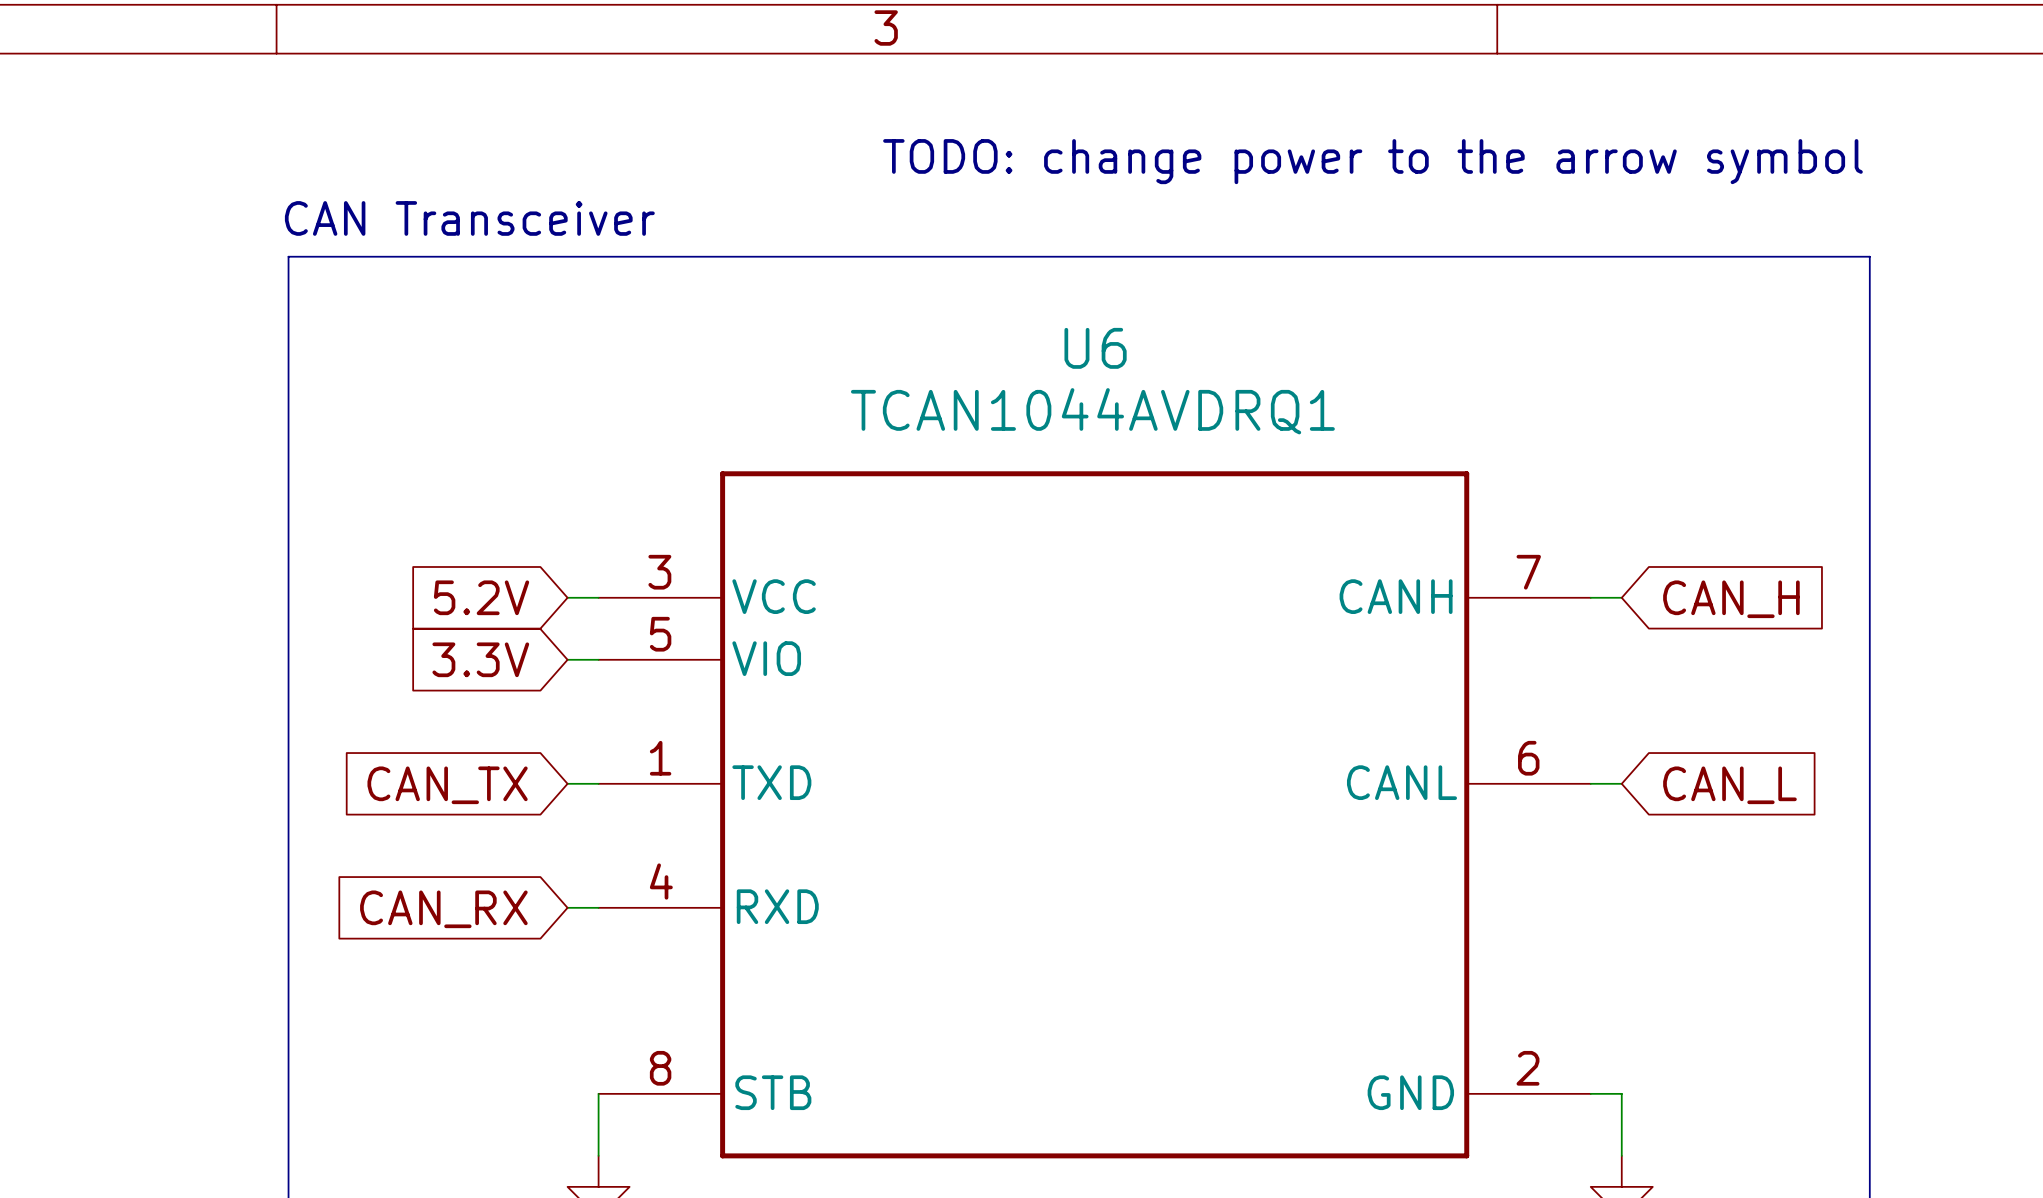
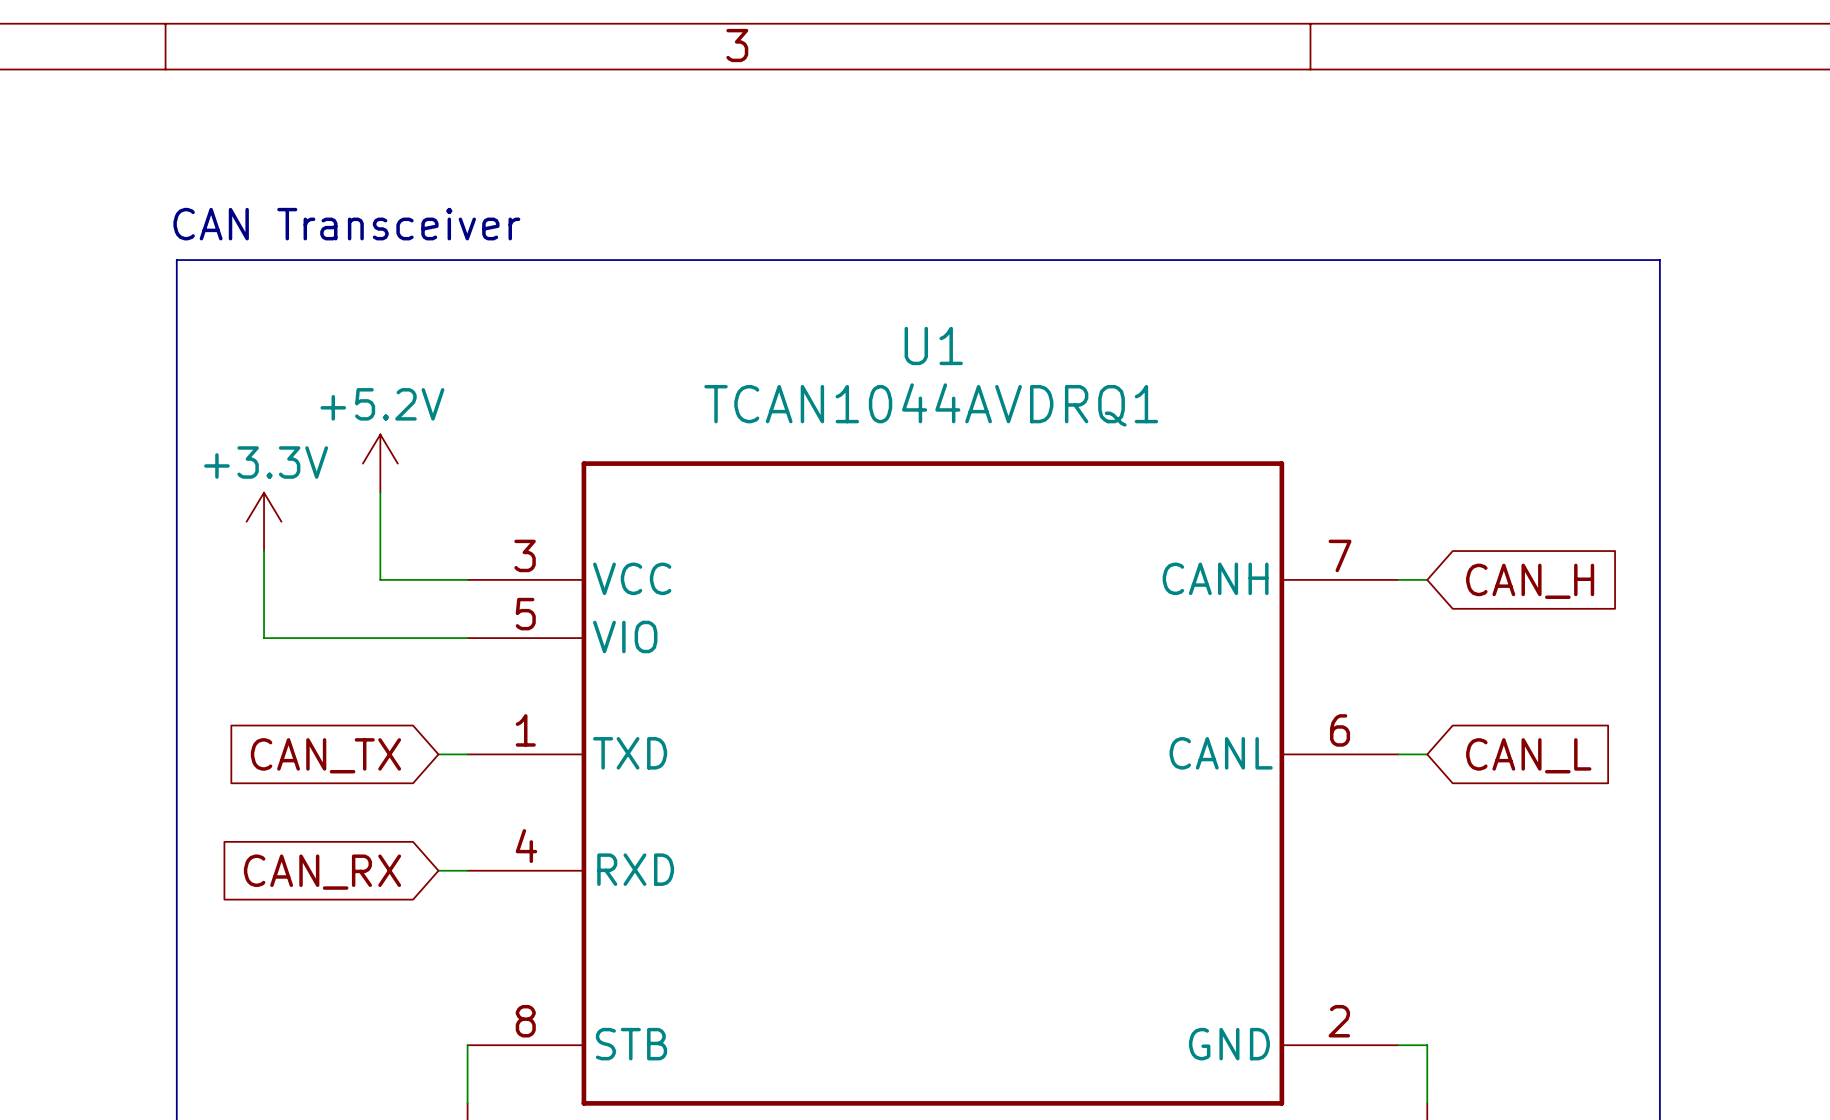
text: TODO: change power to the arrow symbol (1372, 161) -> none
U6 name: U6 (1095, 348) -> U1 (933, 345)
power symbol: none -> +5.2V (380, 463)
wire: none -> (380, 492) (380, 579) (438, 579)
power symbol: none -> +3.3V (264, 521)
wire: none -> (264, 550) (264, 638) (438, 638)
global label: 5.2V (481, 597) -> none
global label: 3.3V (480, 659) -> none

